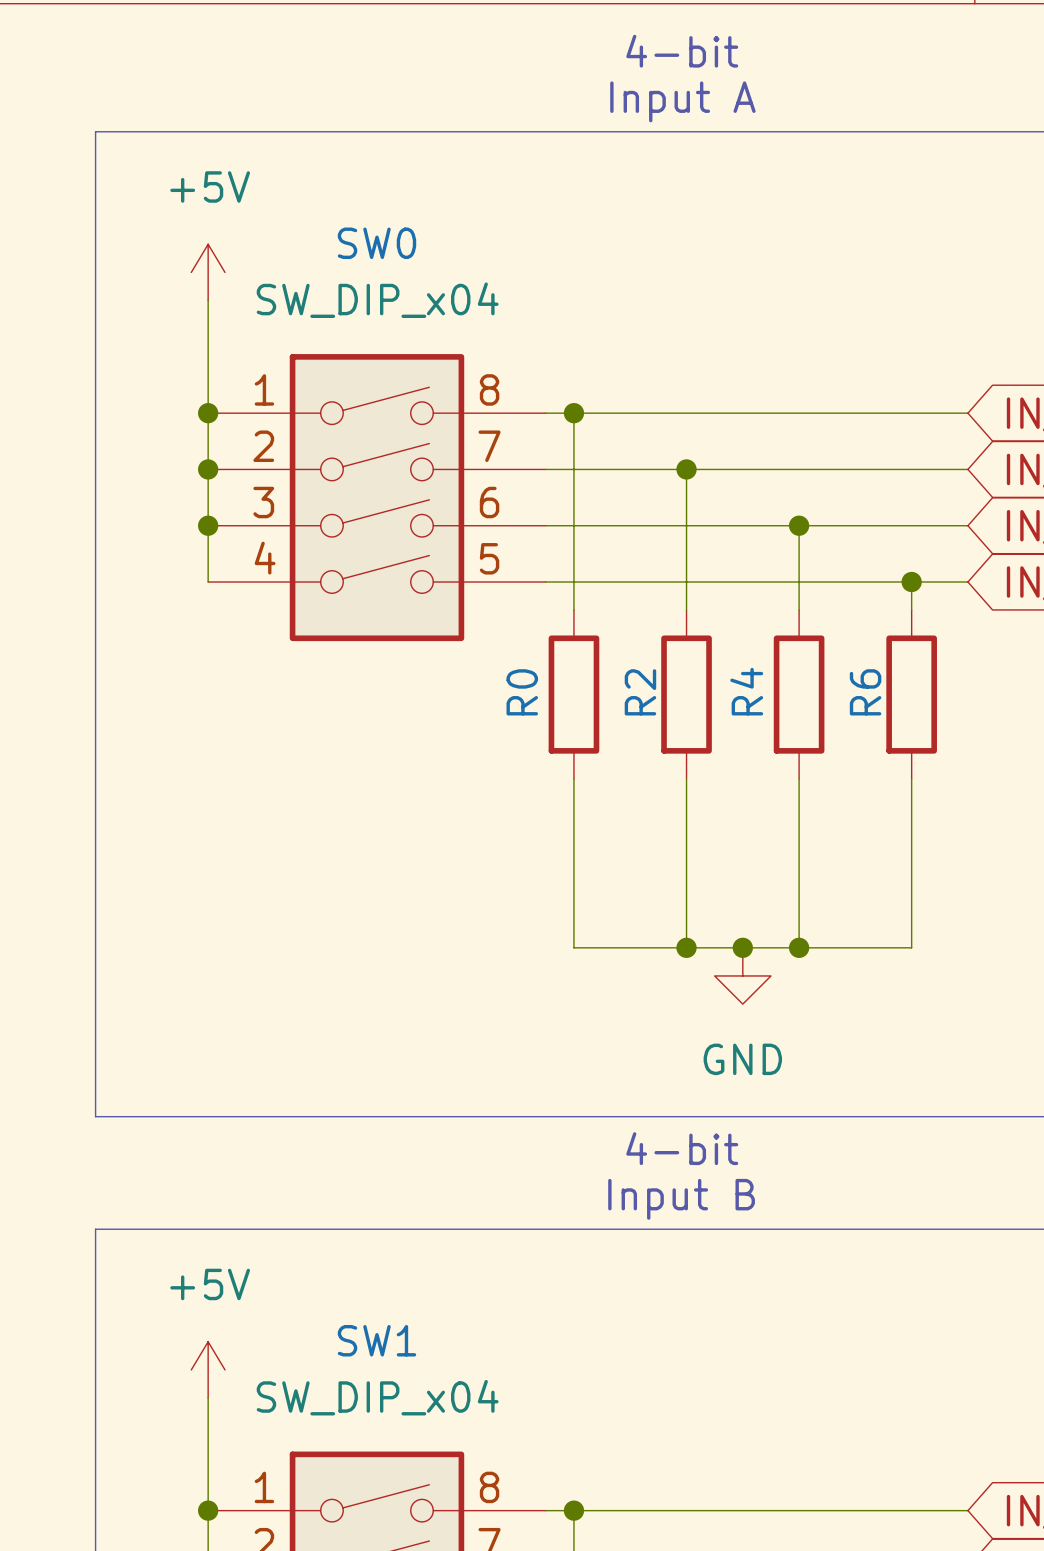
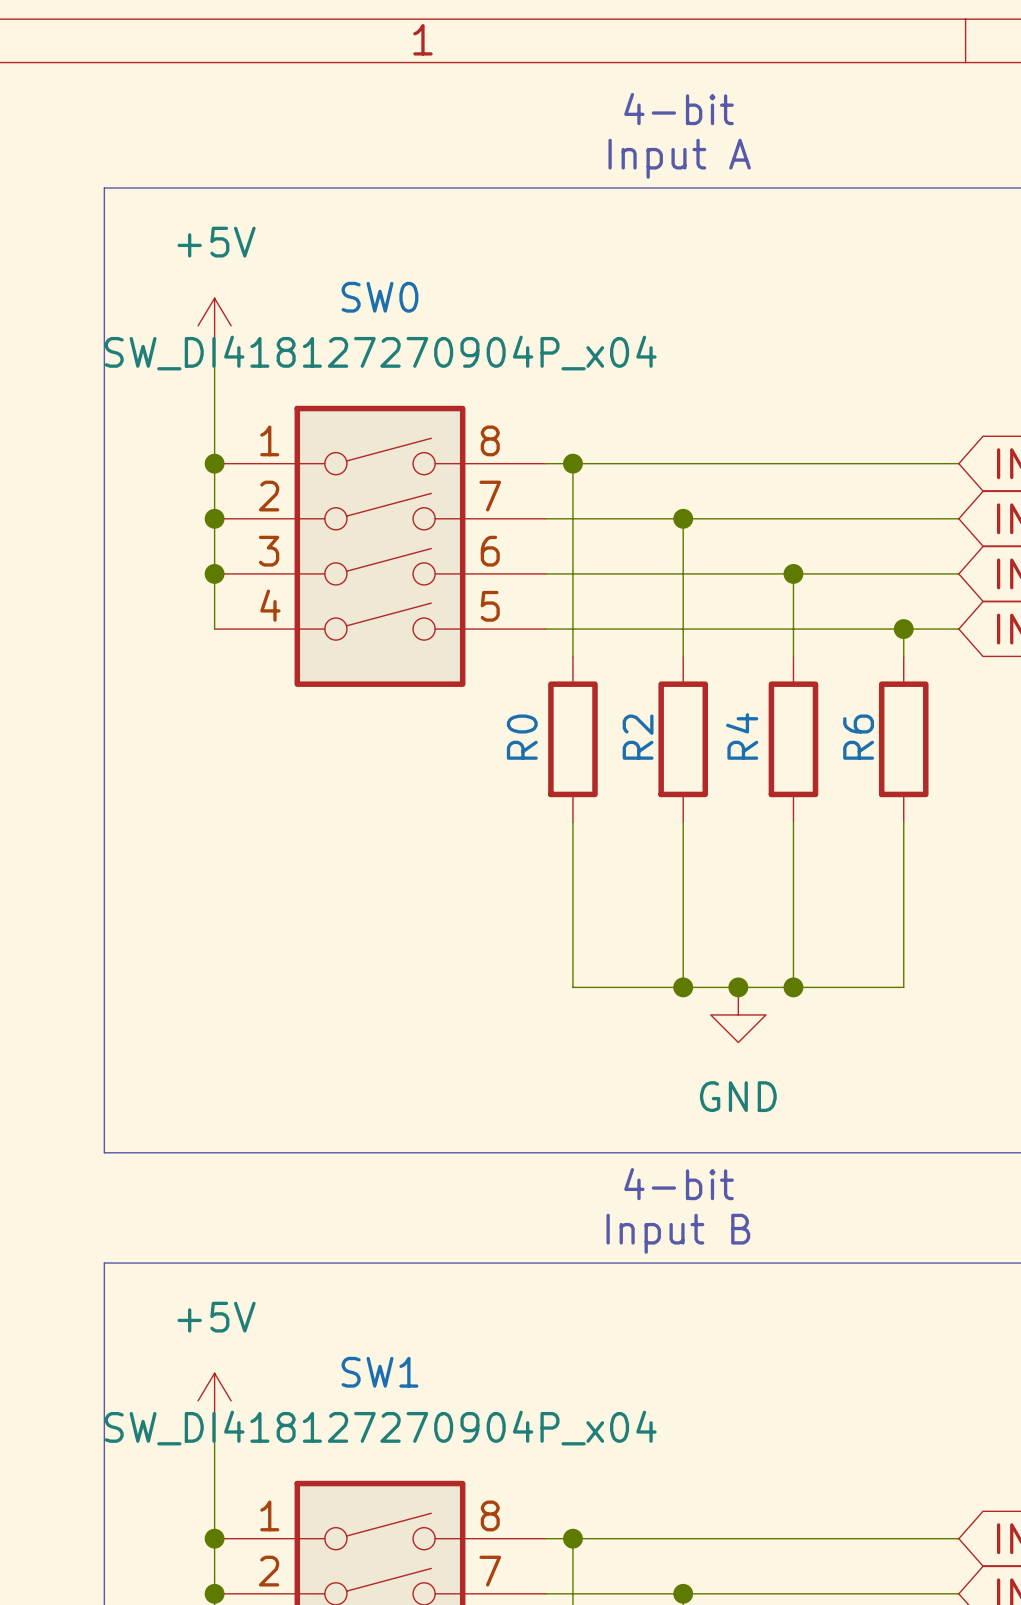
SW0 value: SW_DIP_x04 (377, 300) -> SW_DI418127270904P_x04 (380, 353)
SW1 value: SW_DIP_x04 (377, 1397) -> SW_DI418127270904P_x04 (380, 1428)

